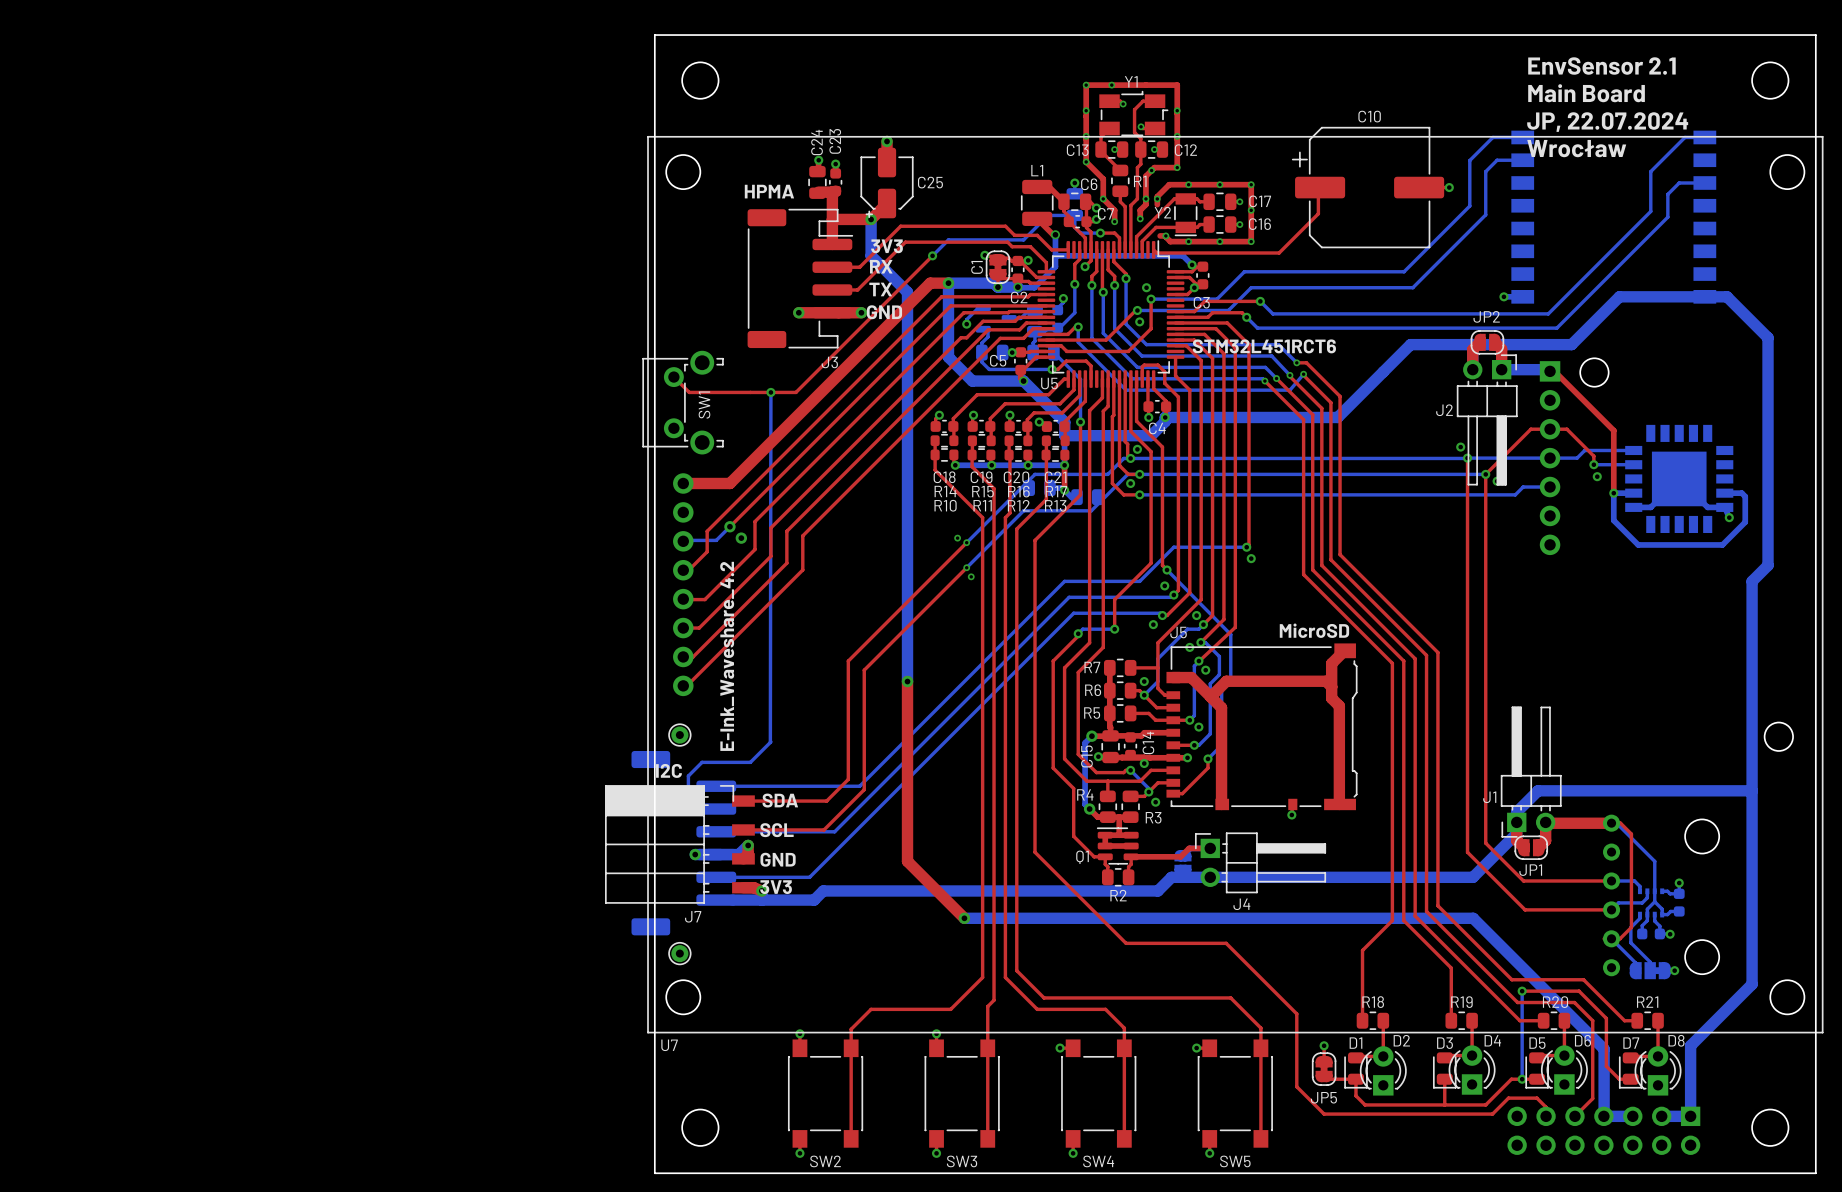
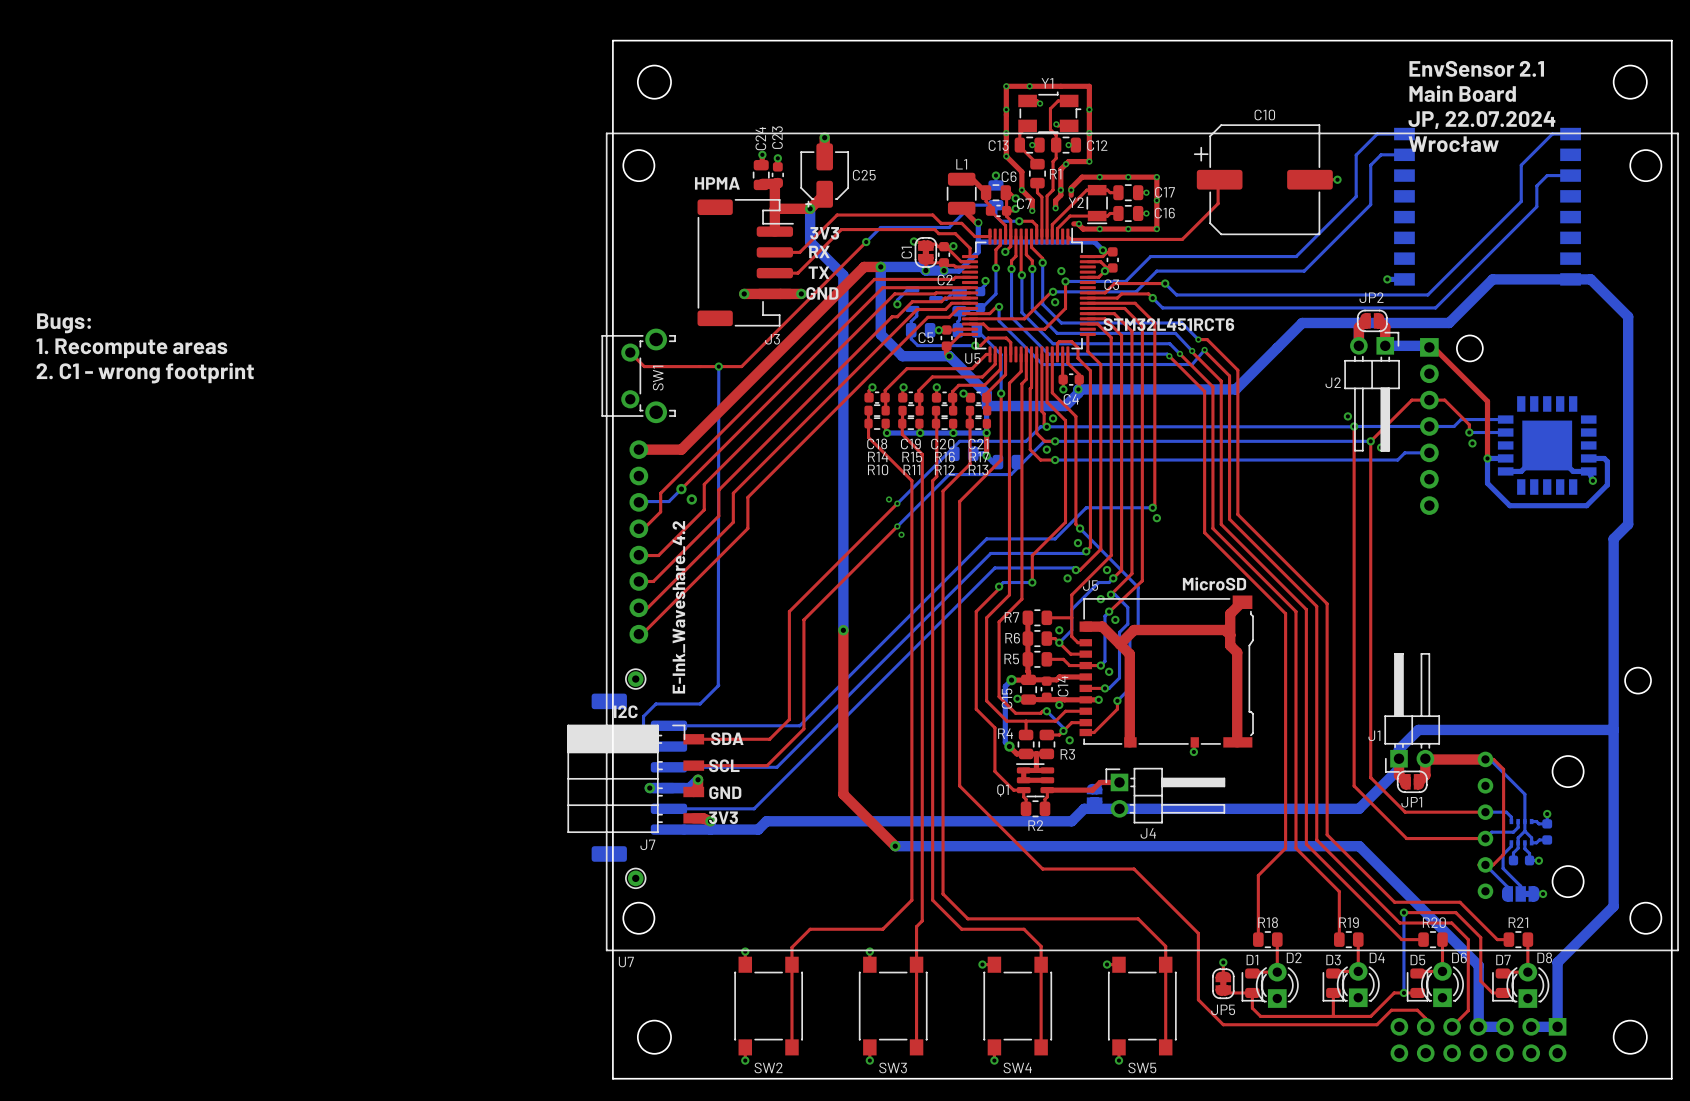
text: none -> Bugs: (64, 323)
text: none -> 1. Recompute areas (131, 348)
text: none -> 2. C1 - wrong footprint (145, 373)

